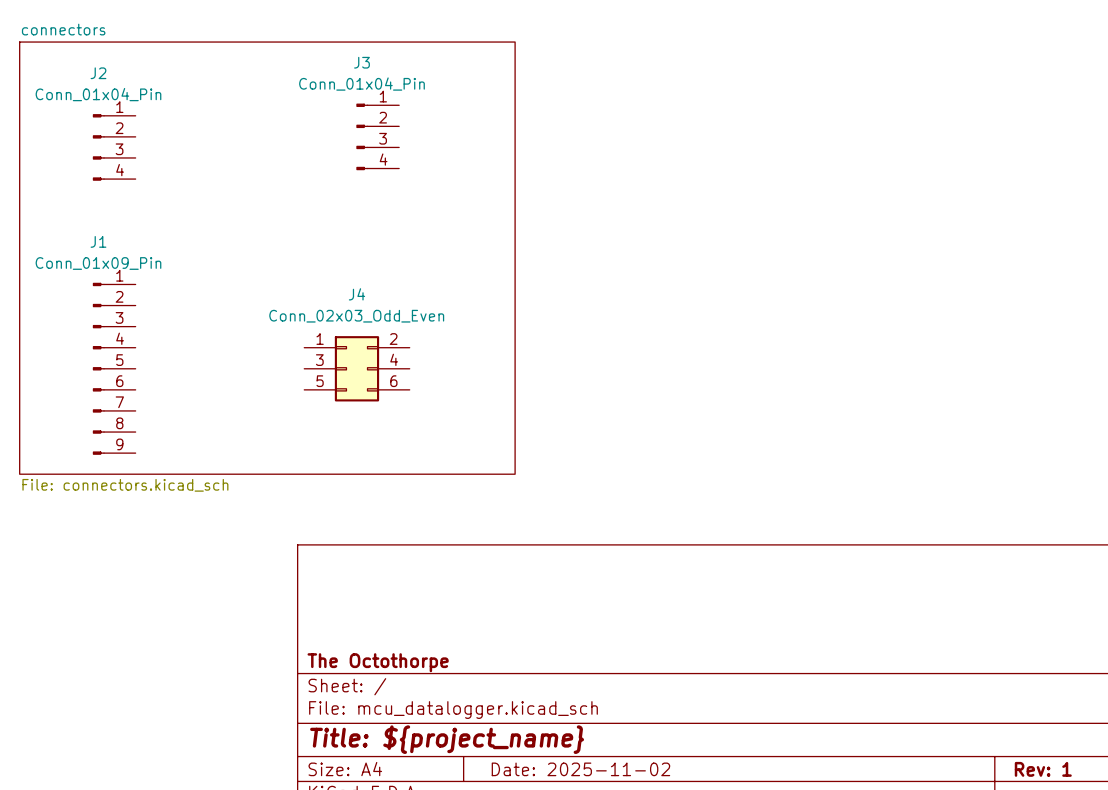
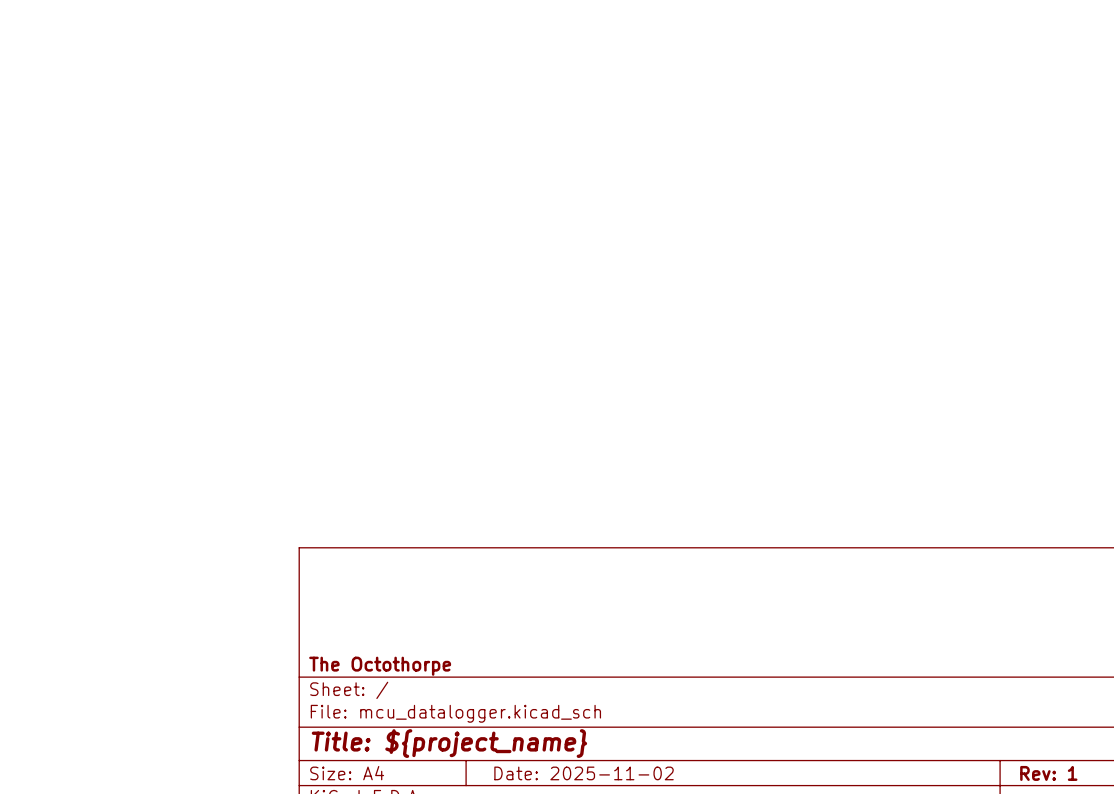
J3: Conn_01x04_Pin (377, 136) -> none
J2: Conn_01x04_Pin (114, 147) -> none
sheet connectors: File: connectors.kicad_sch (267, 258) -> none
J1: Conn_01x09_Pin (114, 368) -> none
J4: Conn_02x03_Odd_Even (356, 368) -> none

